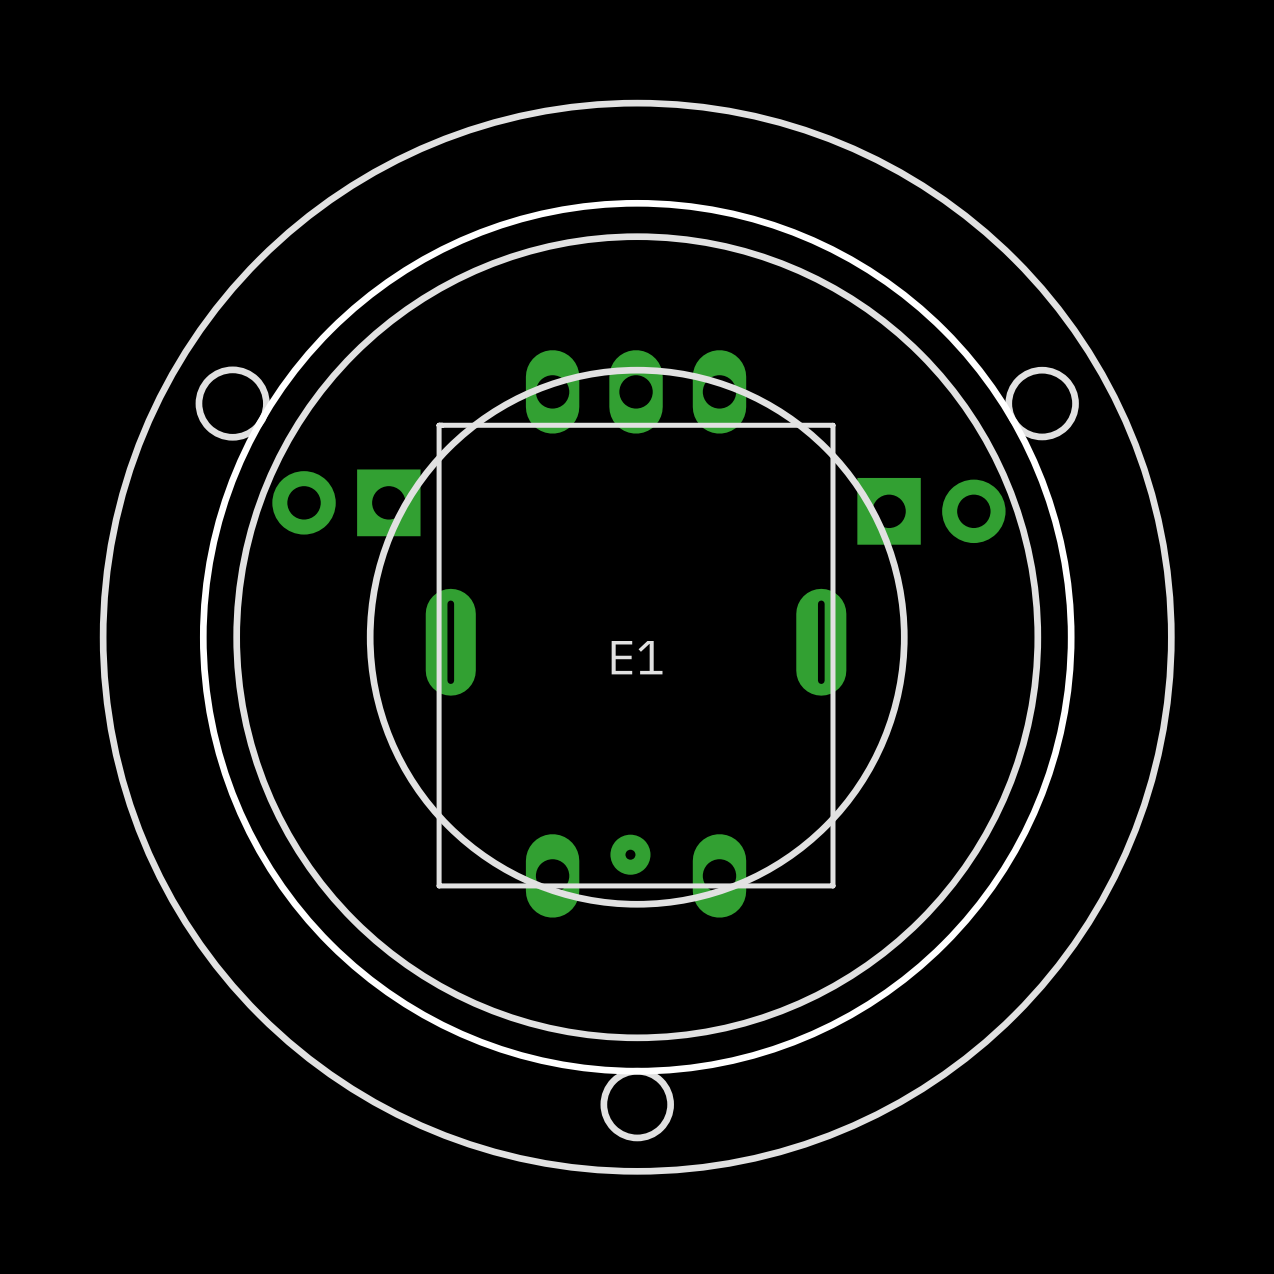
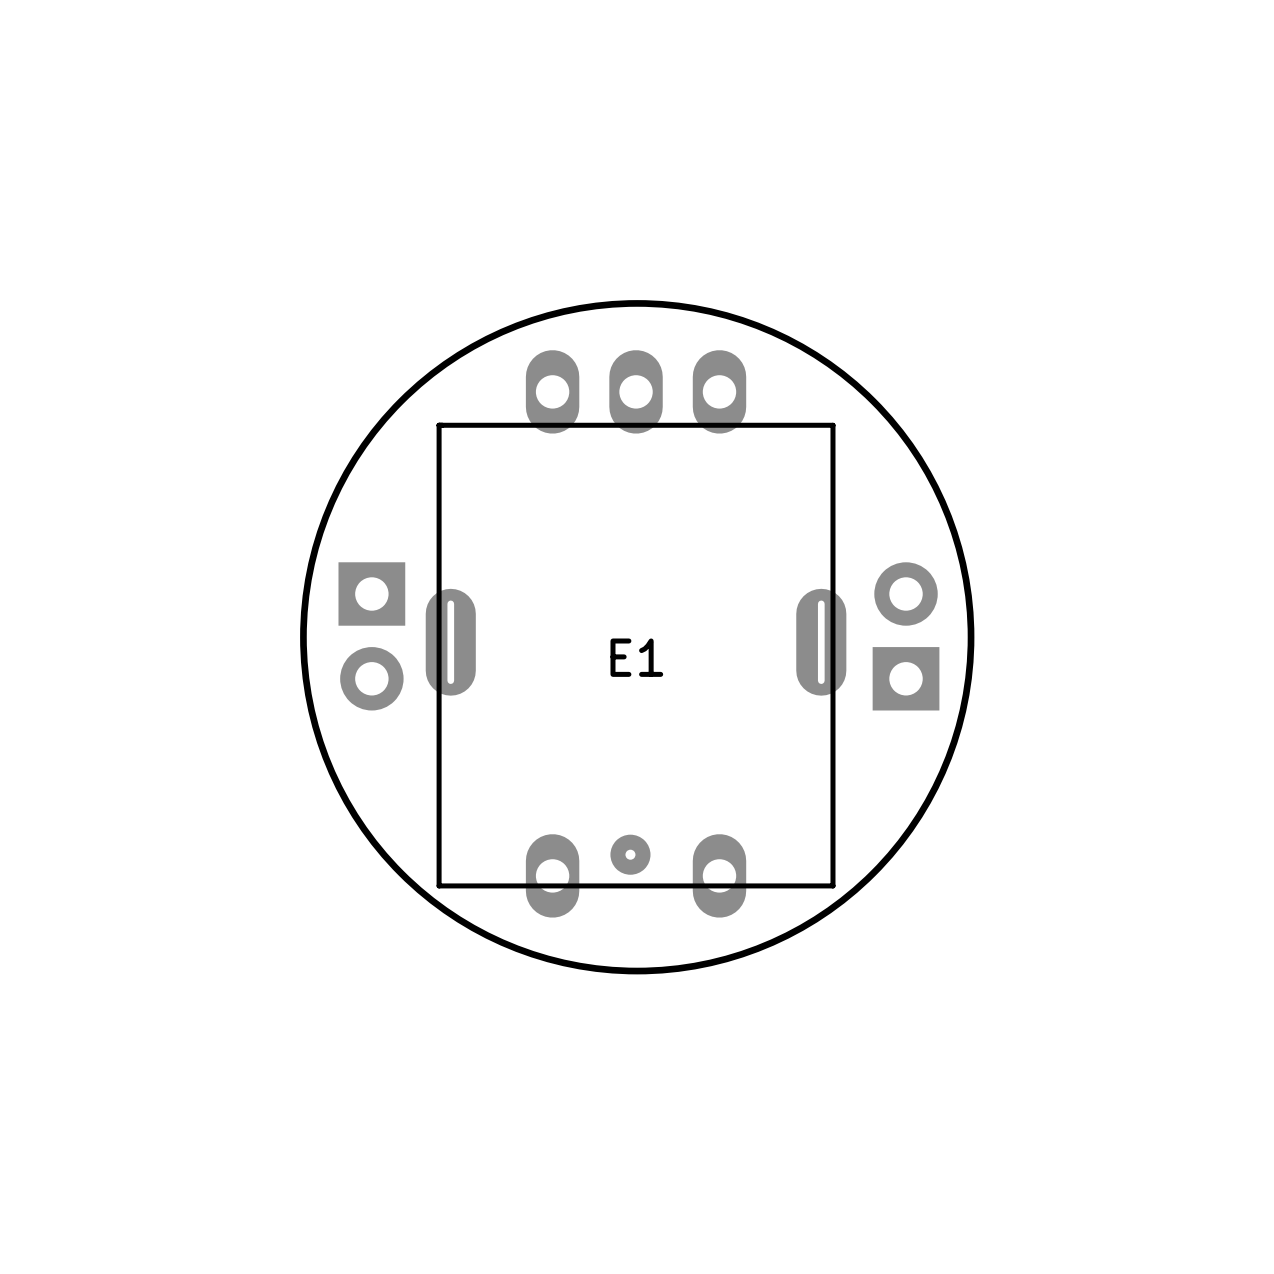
drawing: [99, 99, 1175, 1175] -> none
round board edge size: [199, 199, 1075, 1075] -> [300, 300, 975, 975]
part rotation: 0° (346, 502) -> 90° counterclockwise (371, 636)
part position: (346, 502) -> (371, 636)
part rotation: 0° (931, 511) -> 90° counterclockwise (906, 636)
part position: (931, 511) -> (906, 636)

